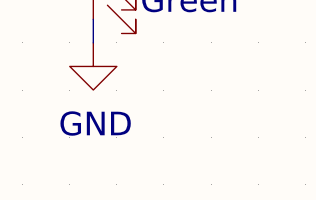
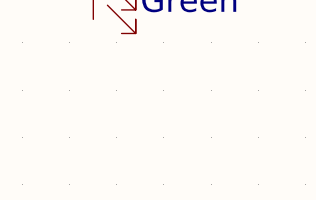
wire: (93, 19) (93, 42) -> none
power symbol: GND (93, 66) -> none

